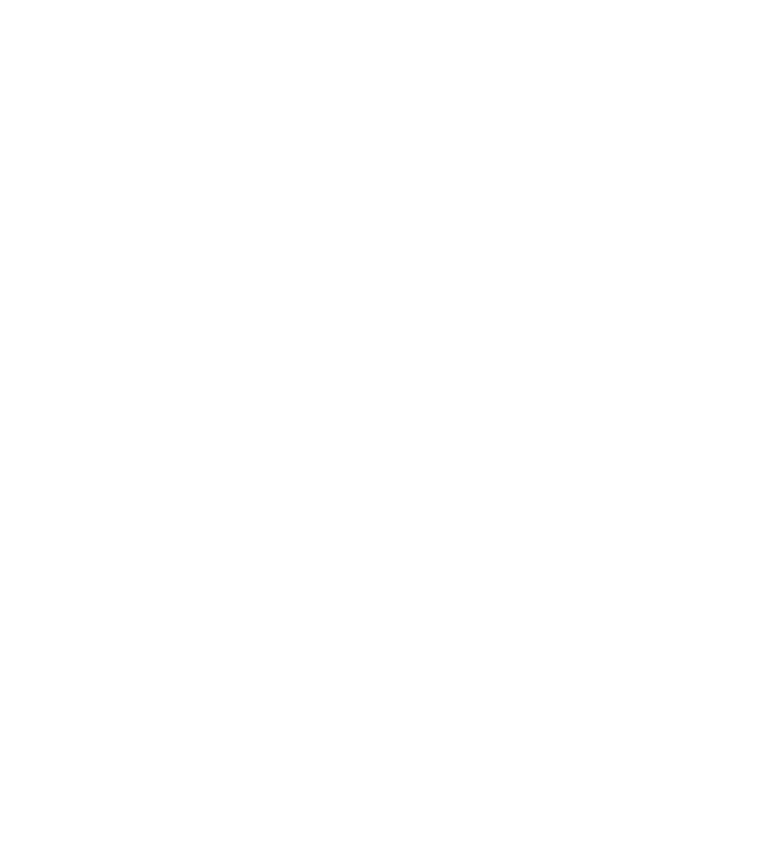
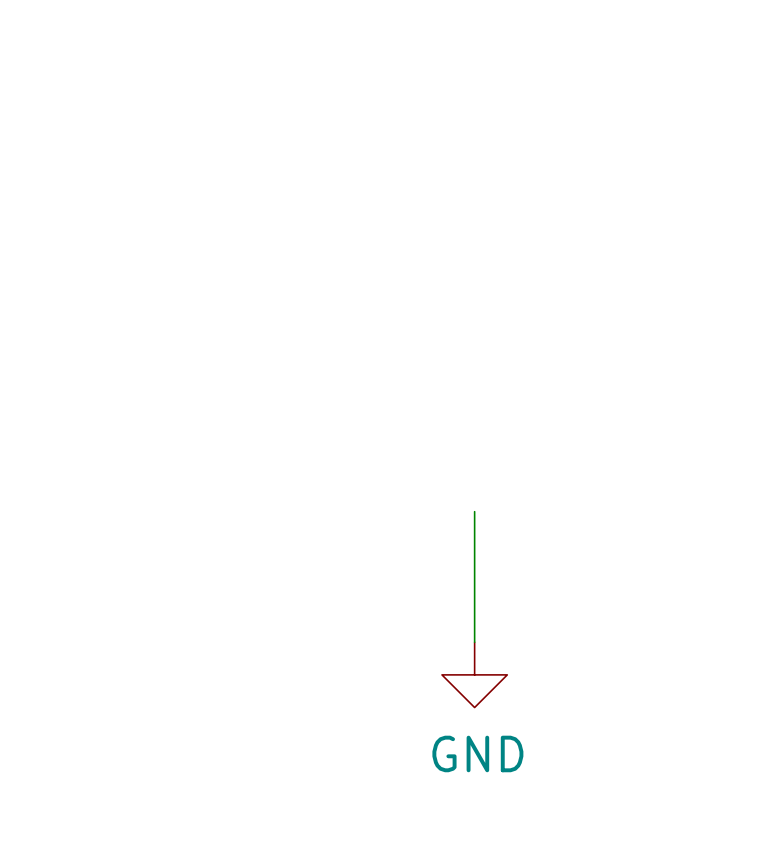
wire: none -> (474, 511) (474, 642)
power symbol: none -> GND (474, 674)

